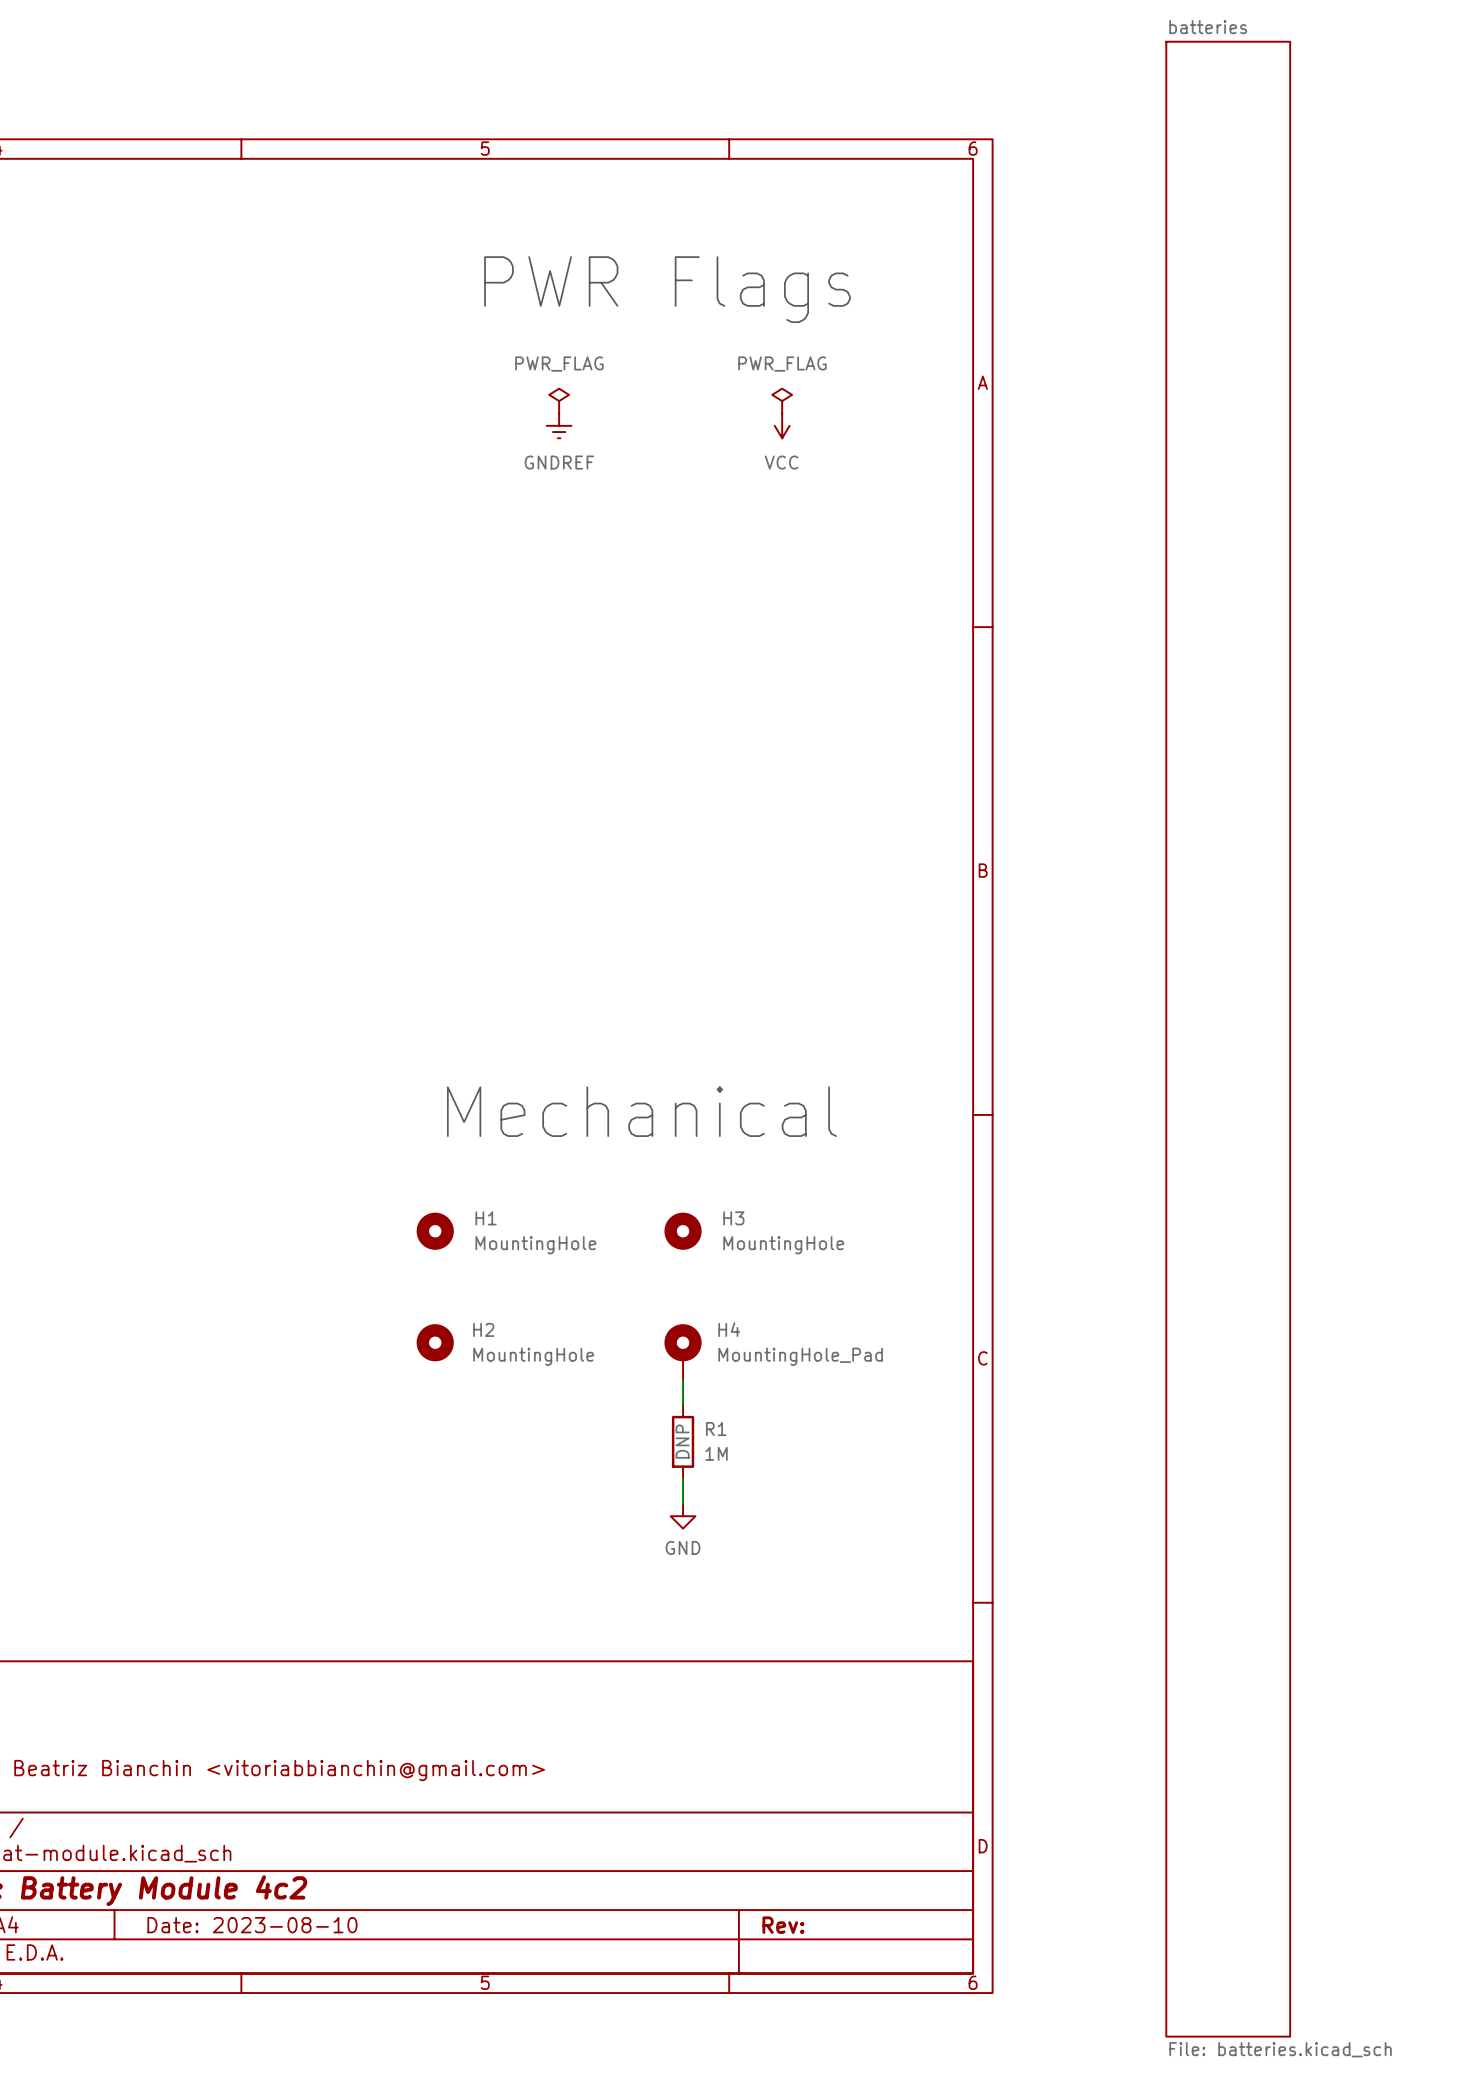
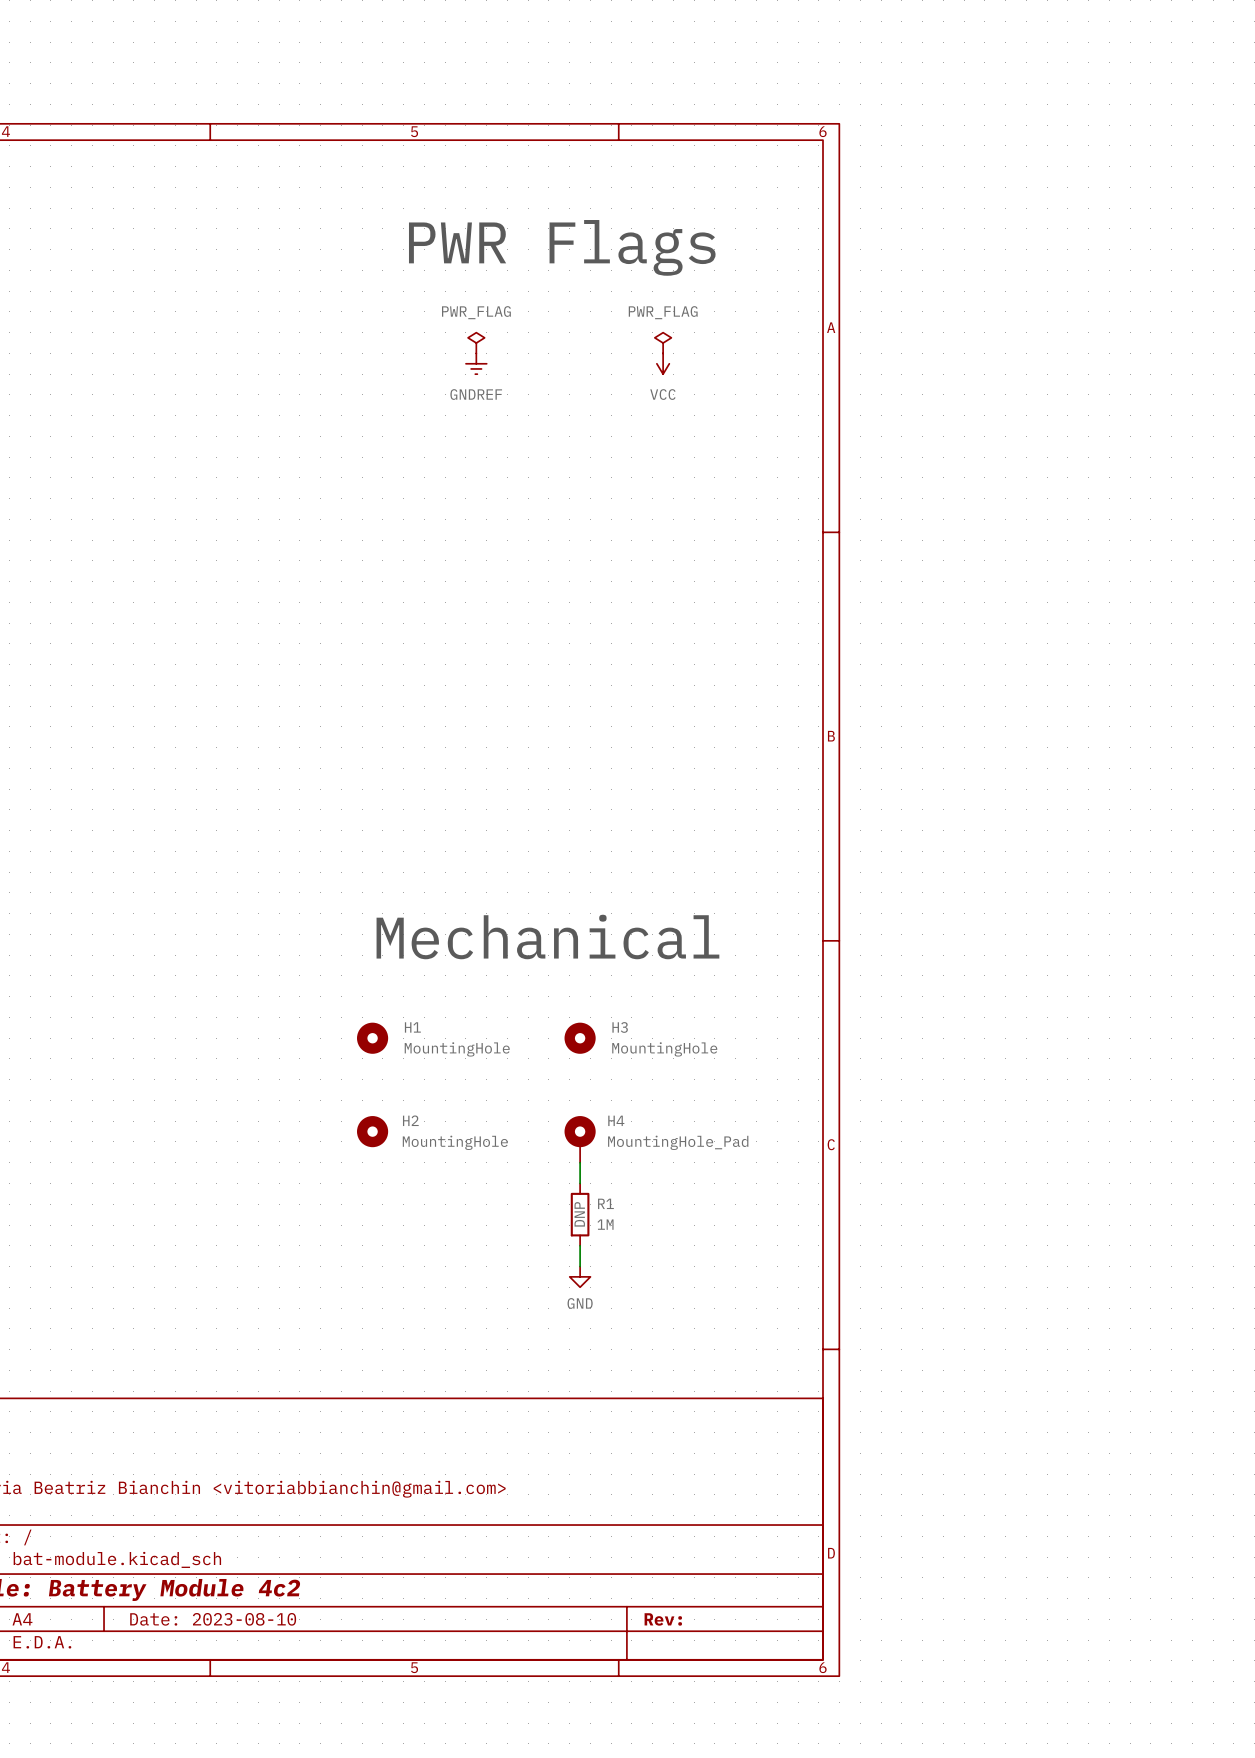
sheet batteries: File: batteries.kicad_sch (1228, 1039) -> none

